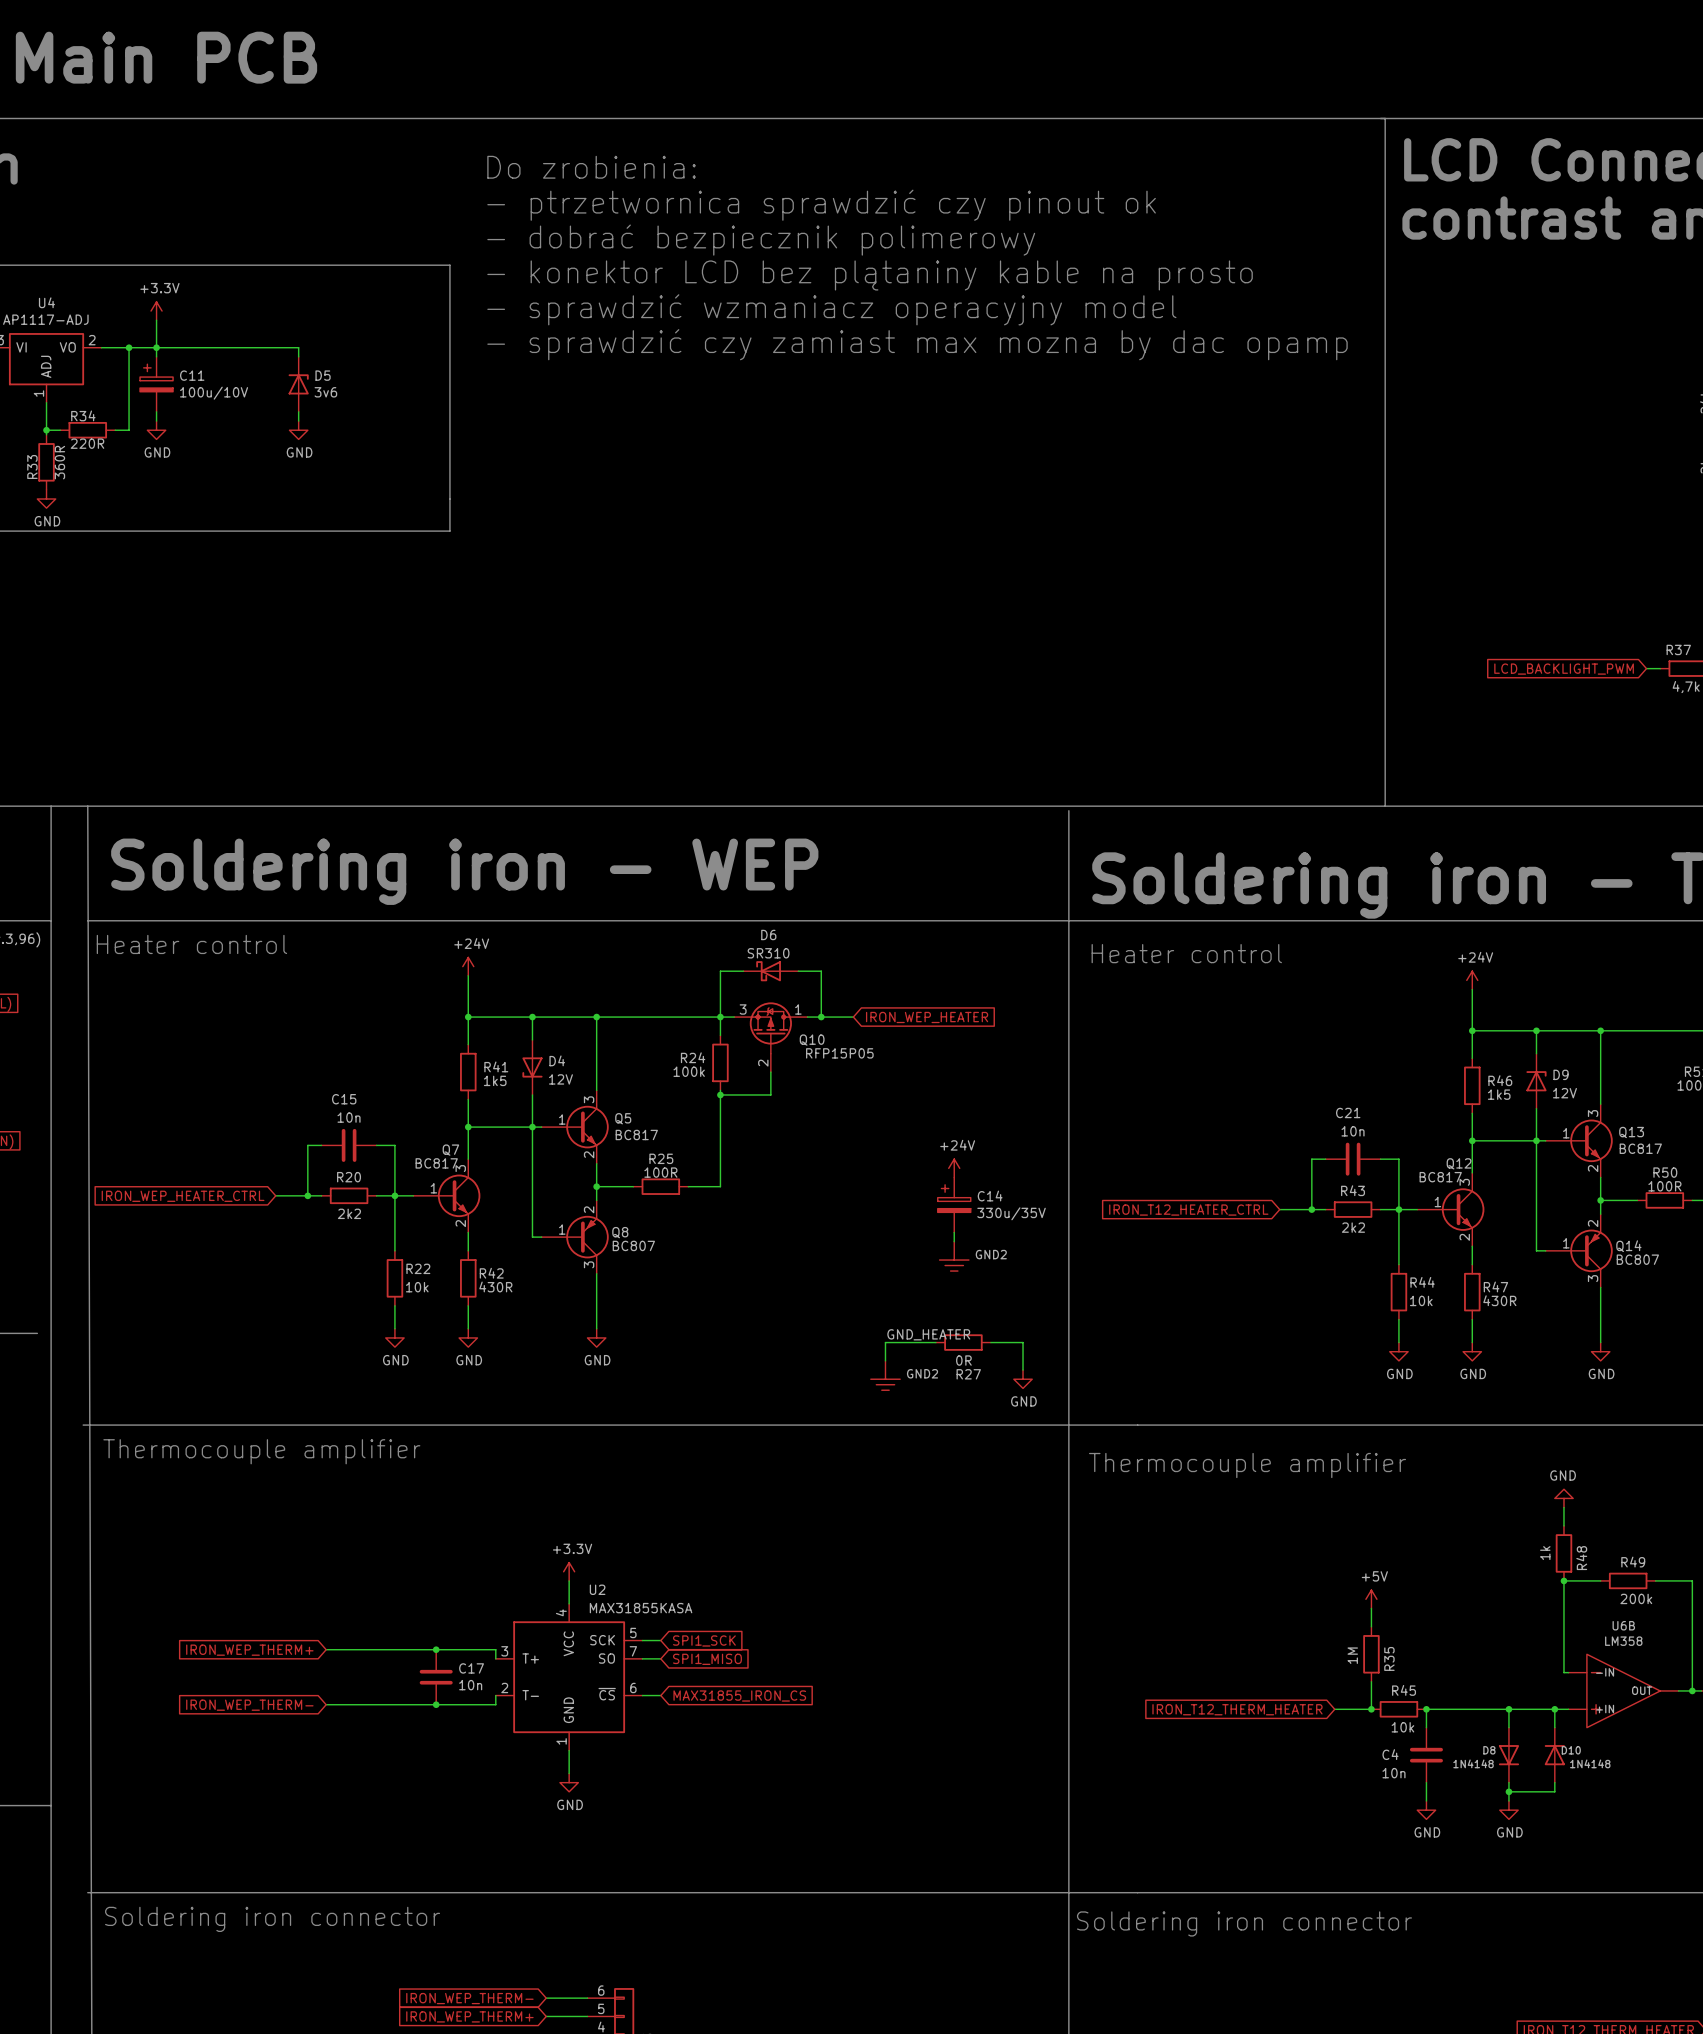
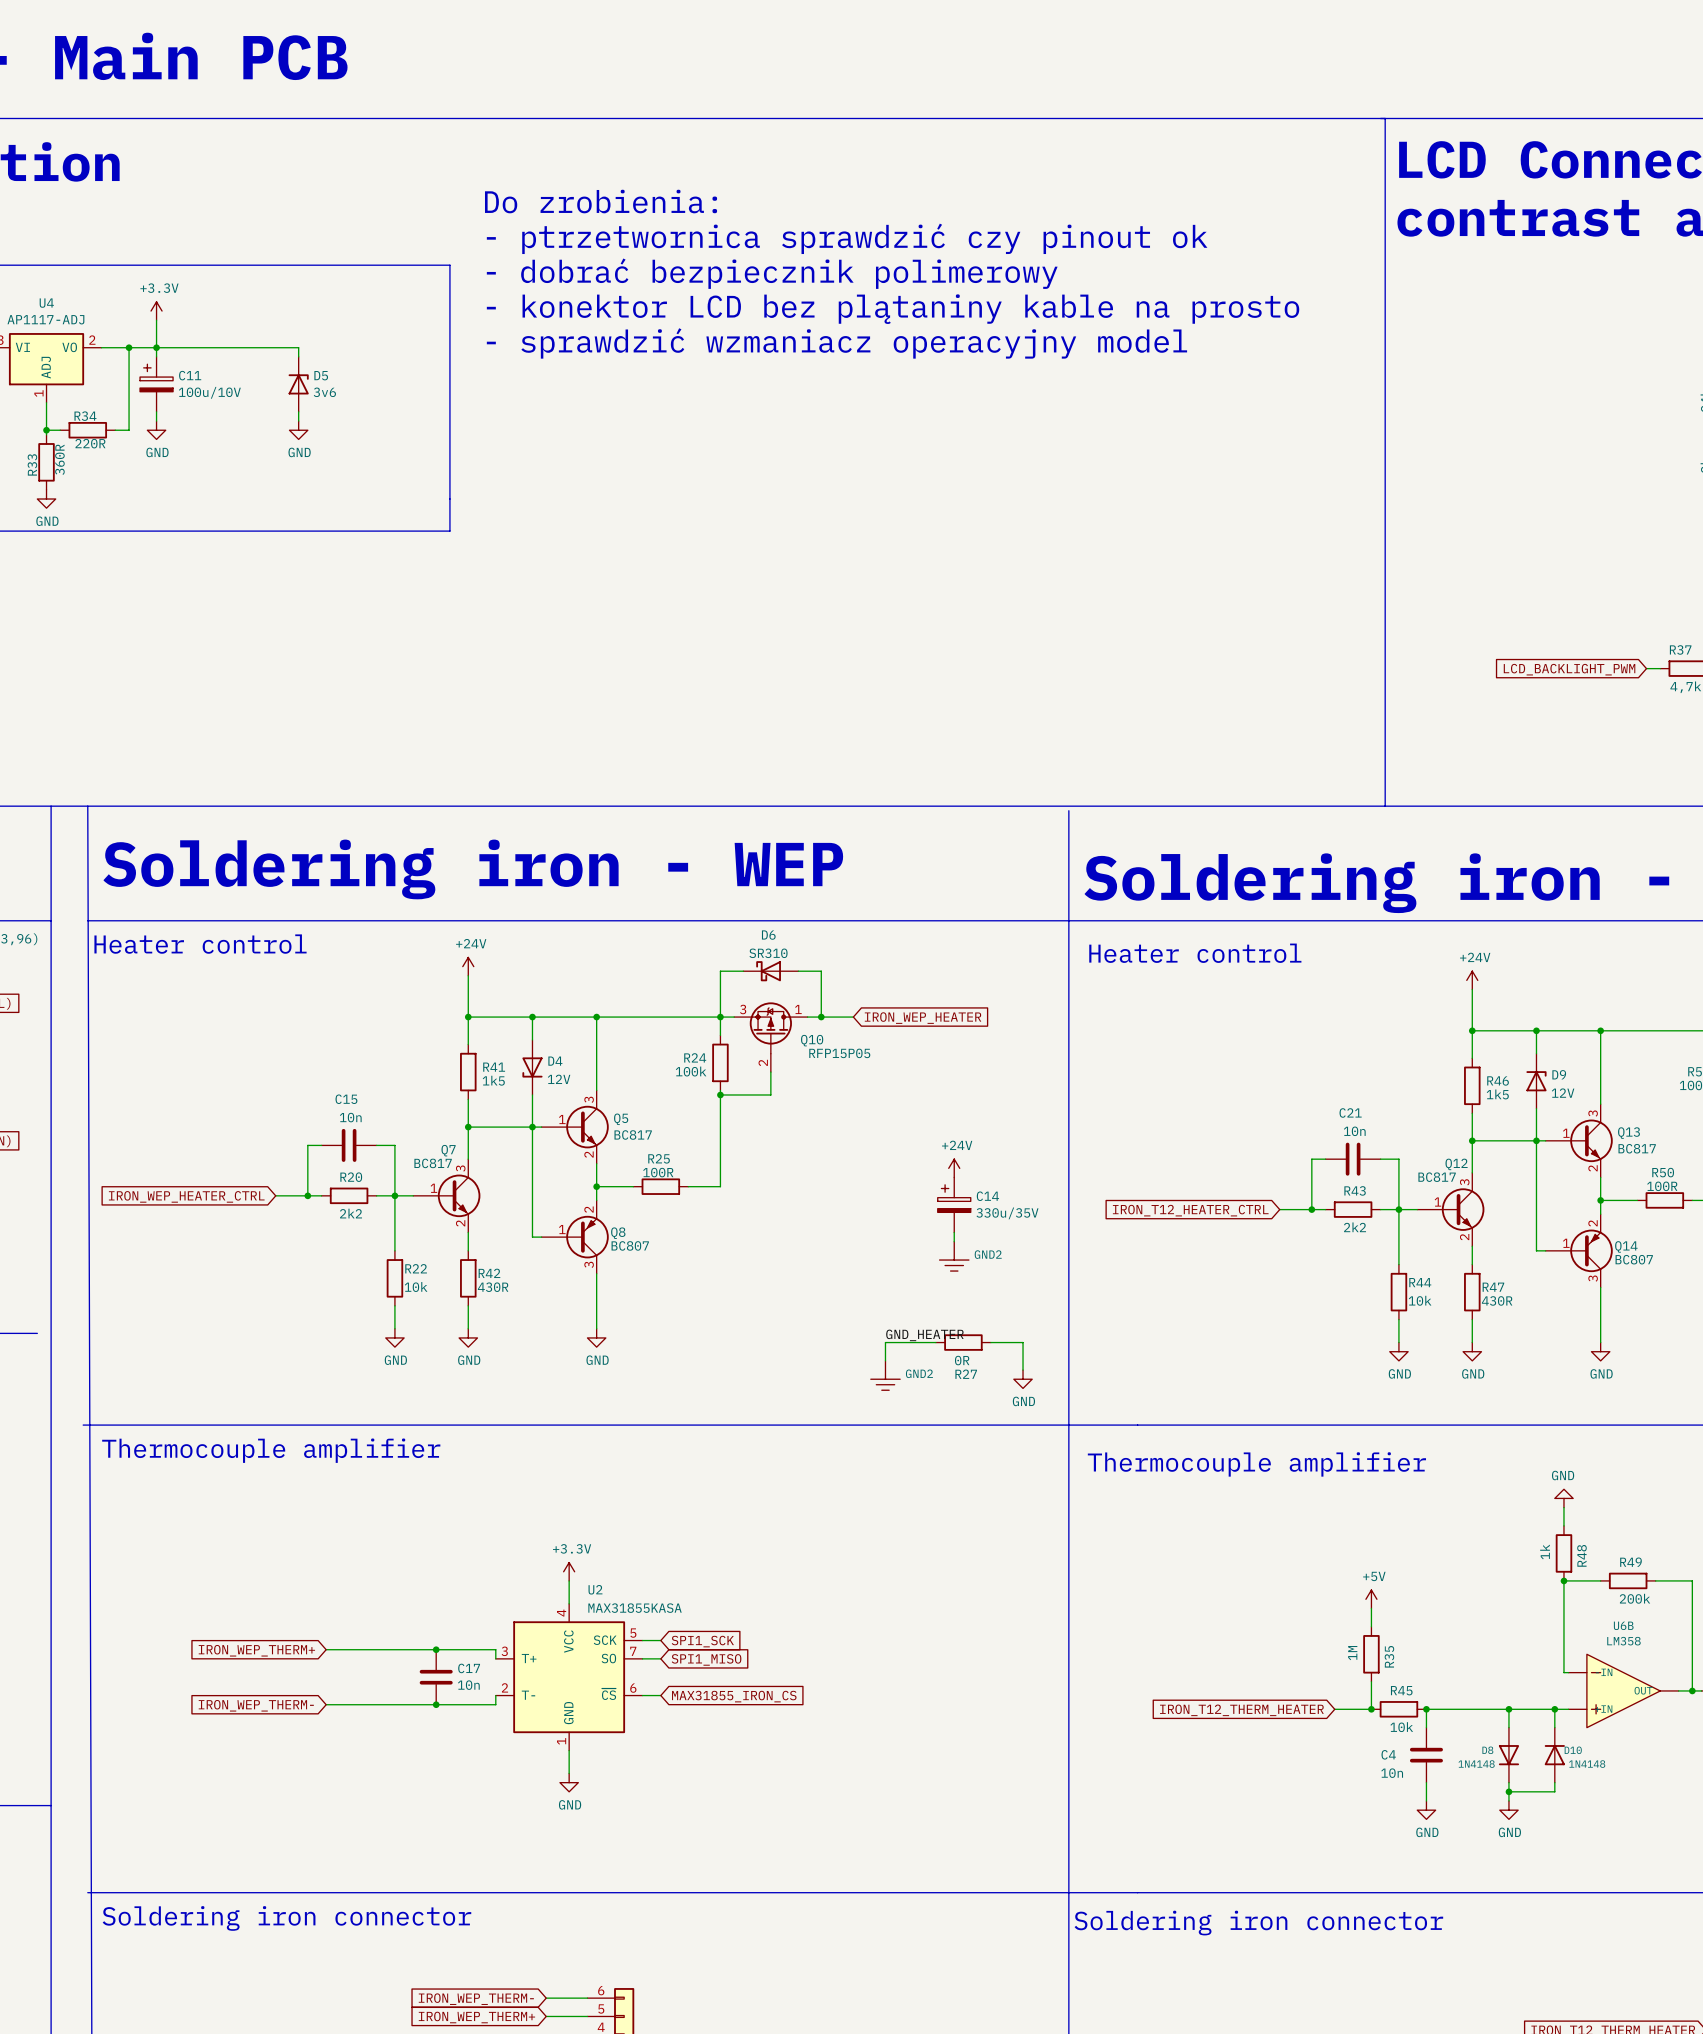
text: Do zrobienia: (591, 167) -> none
text: - ptrzetwornica sprawdzić czy pinout ok (821, 205) -> Do zrobienia: (601, 201)
text: - dobrać bezpiecznik polimerowy (761, 240) -> - ptrzetwornica sprawdzić czy pinout ok (847, 238)
text: - konektor LCD bez plątaniny kable na prosto (870, 275) -> - dobrać bezpiecznik polimerowy (772, 273)
text: - sprawdzić wzmaniacz operacyjny model (831, 309) -> - konektor LCD bez plątaniny kable na prosto (893, 309)
text: - sprawdzić czy zamiast max mozna by dac opamp (917, 344) -> - sprawdzić wzmaniacz operacyjny model (836, 343)

